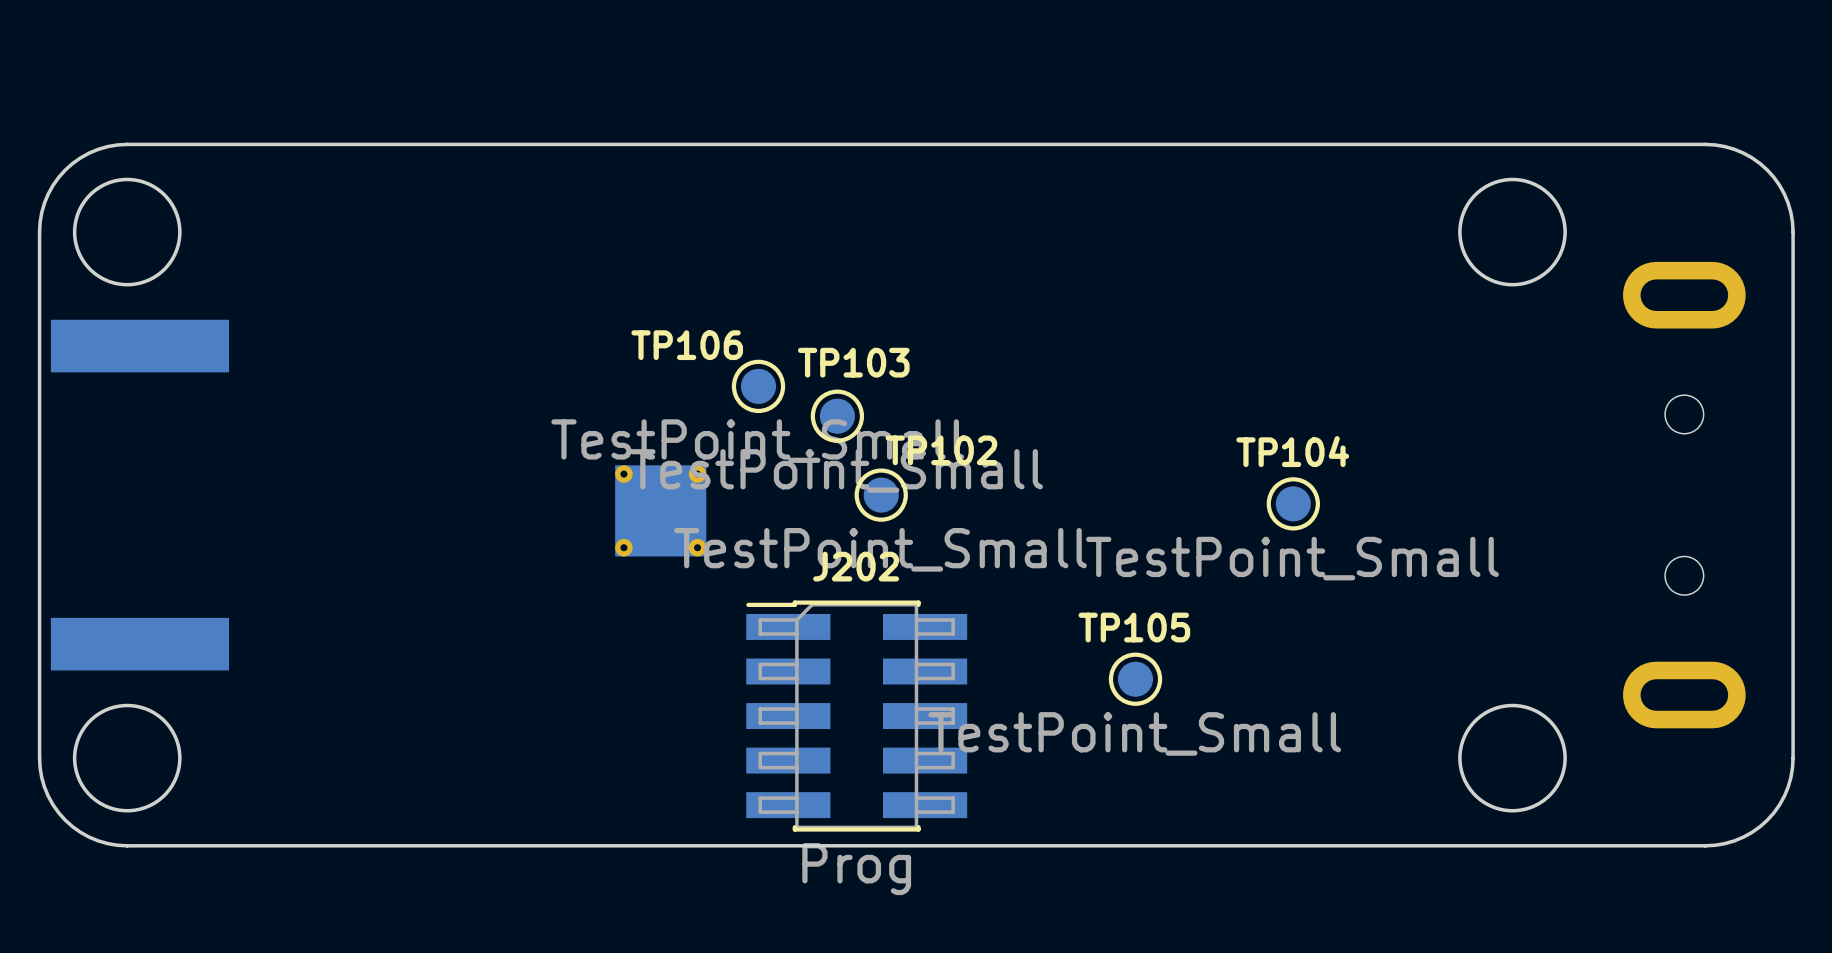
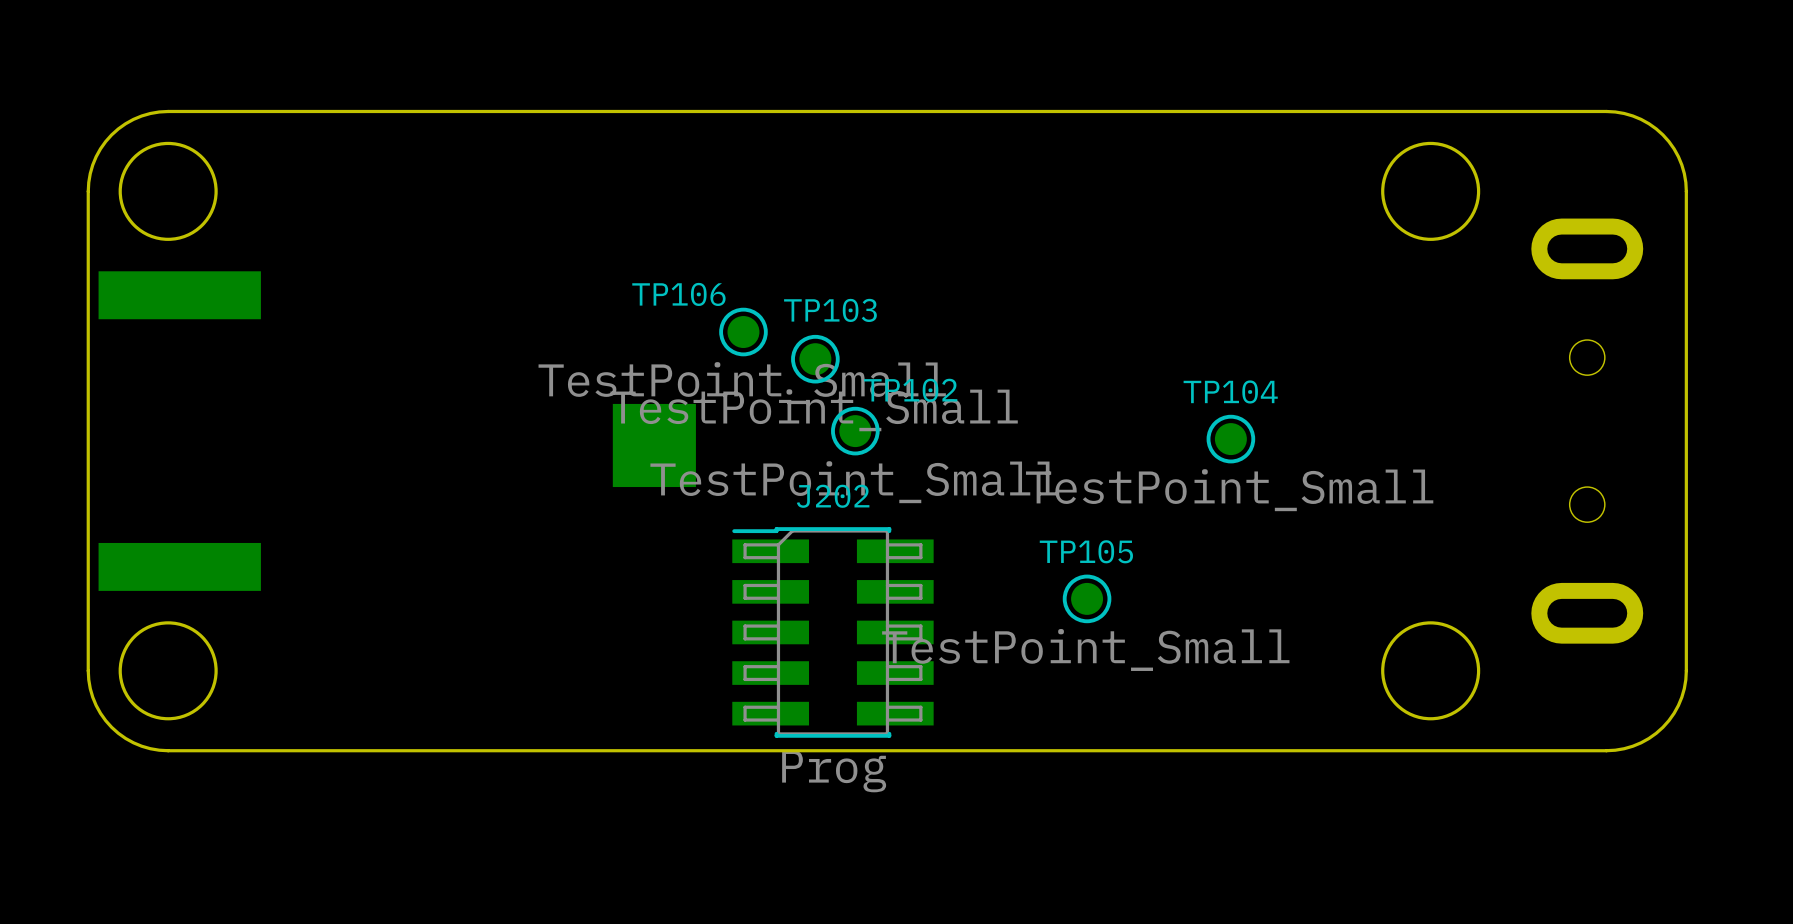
part footprint: [615, 465, 707, 557] -> [612, 403, 696, 488]

